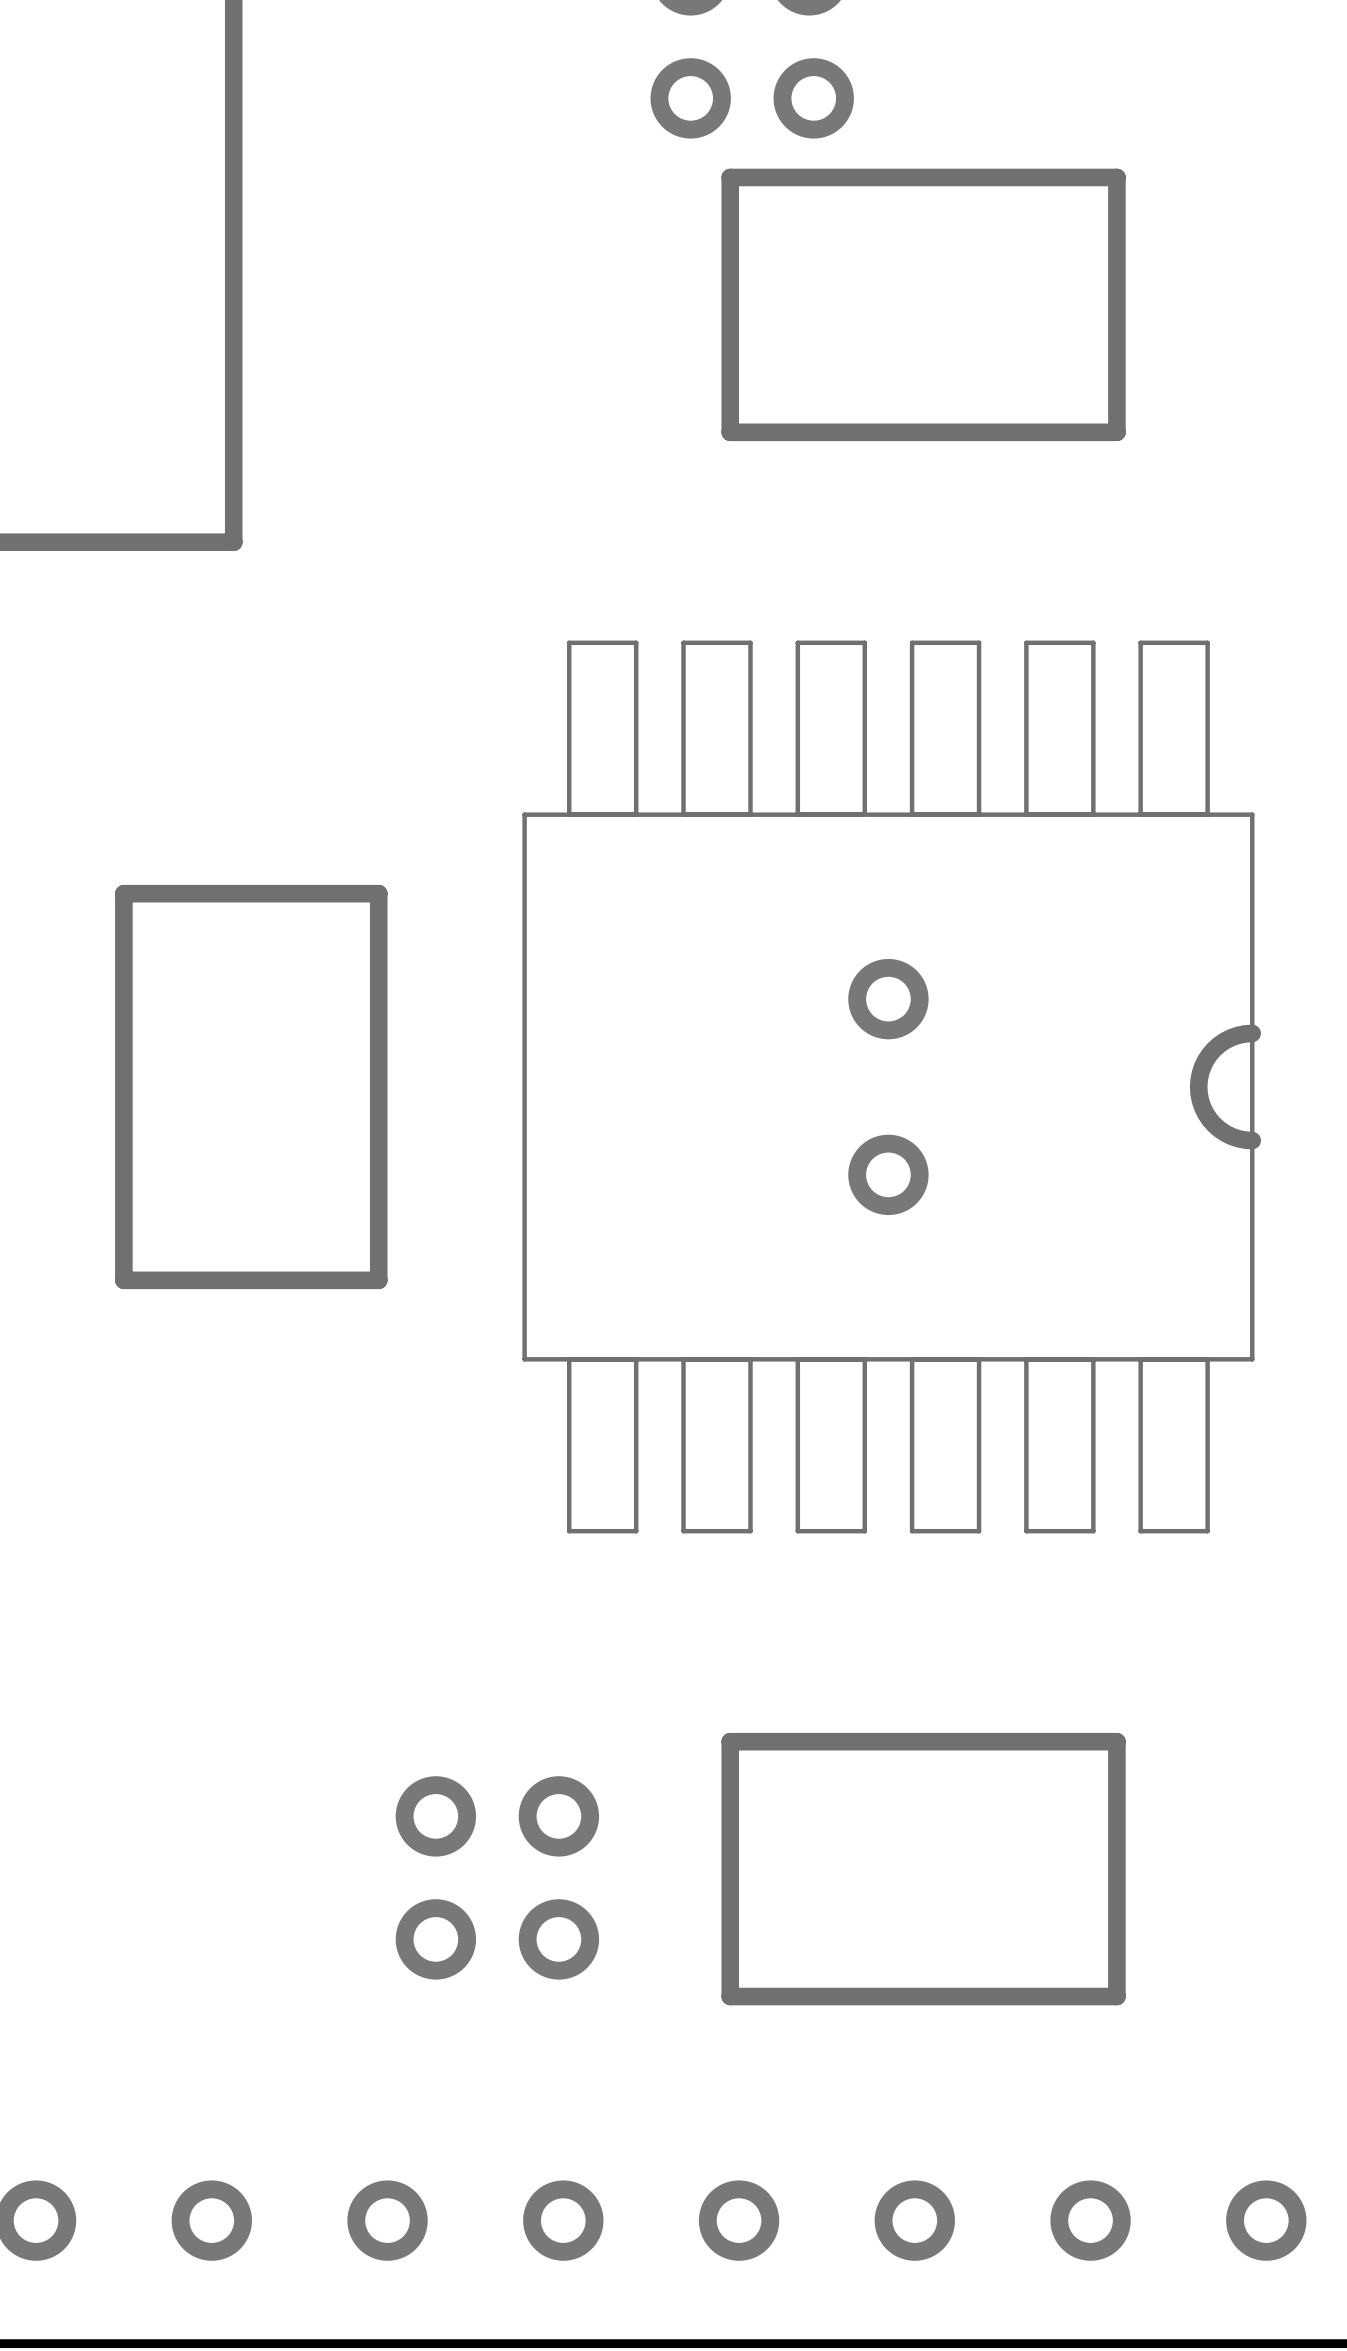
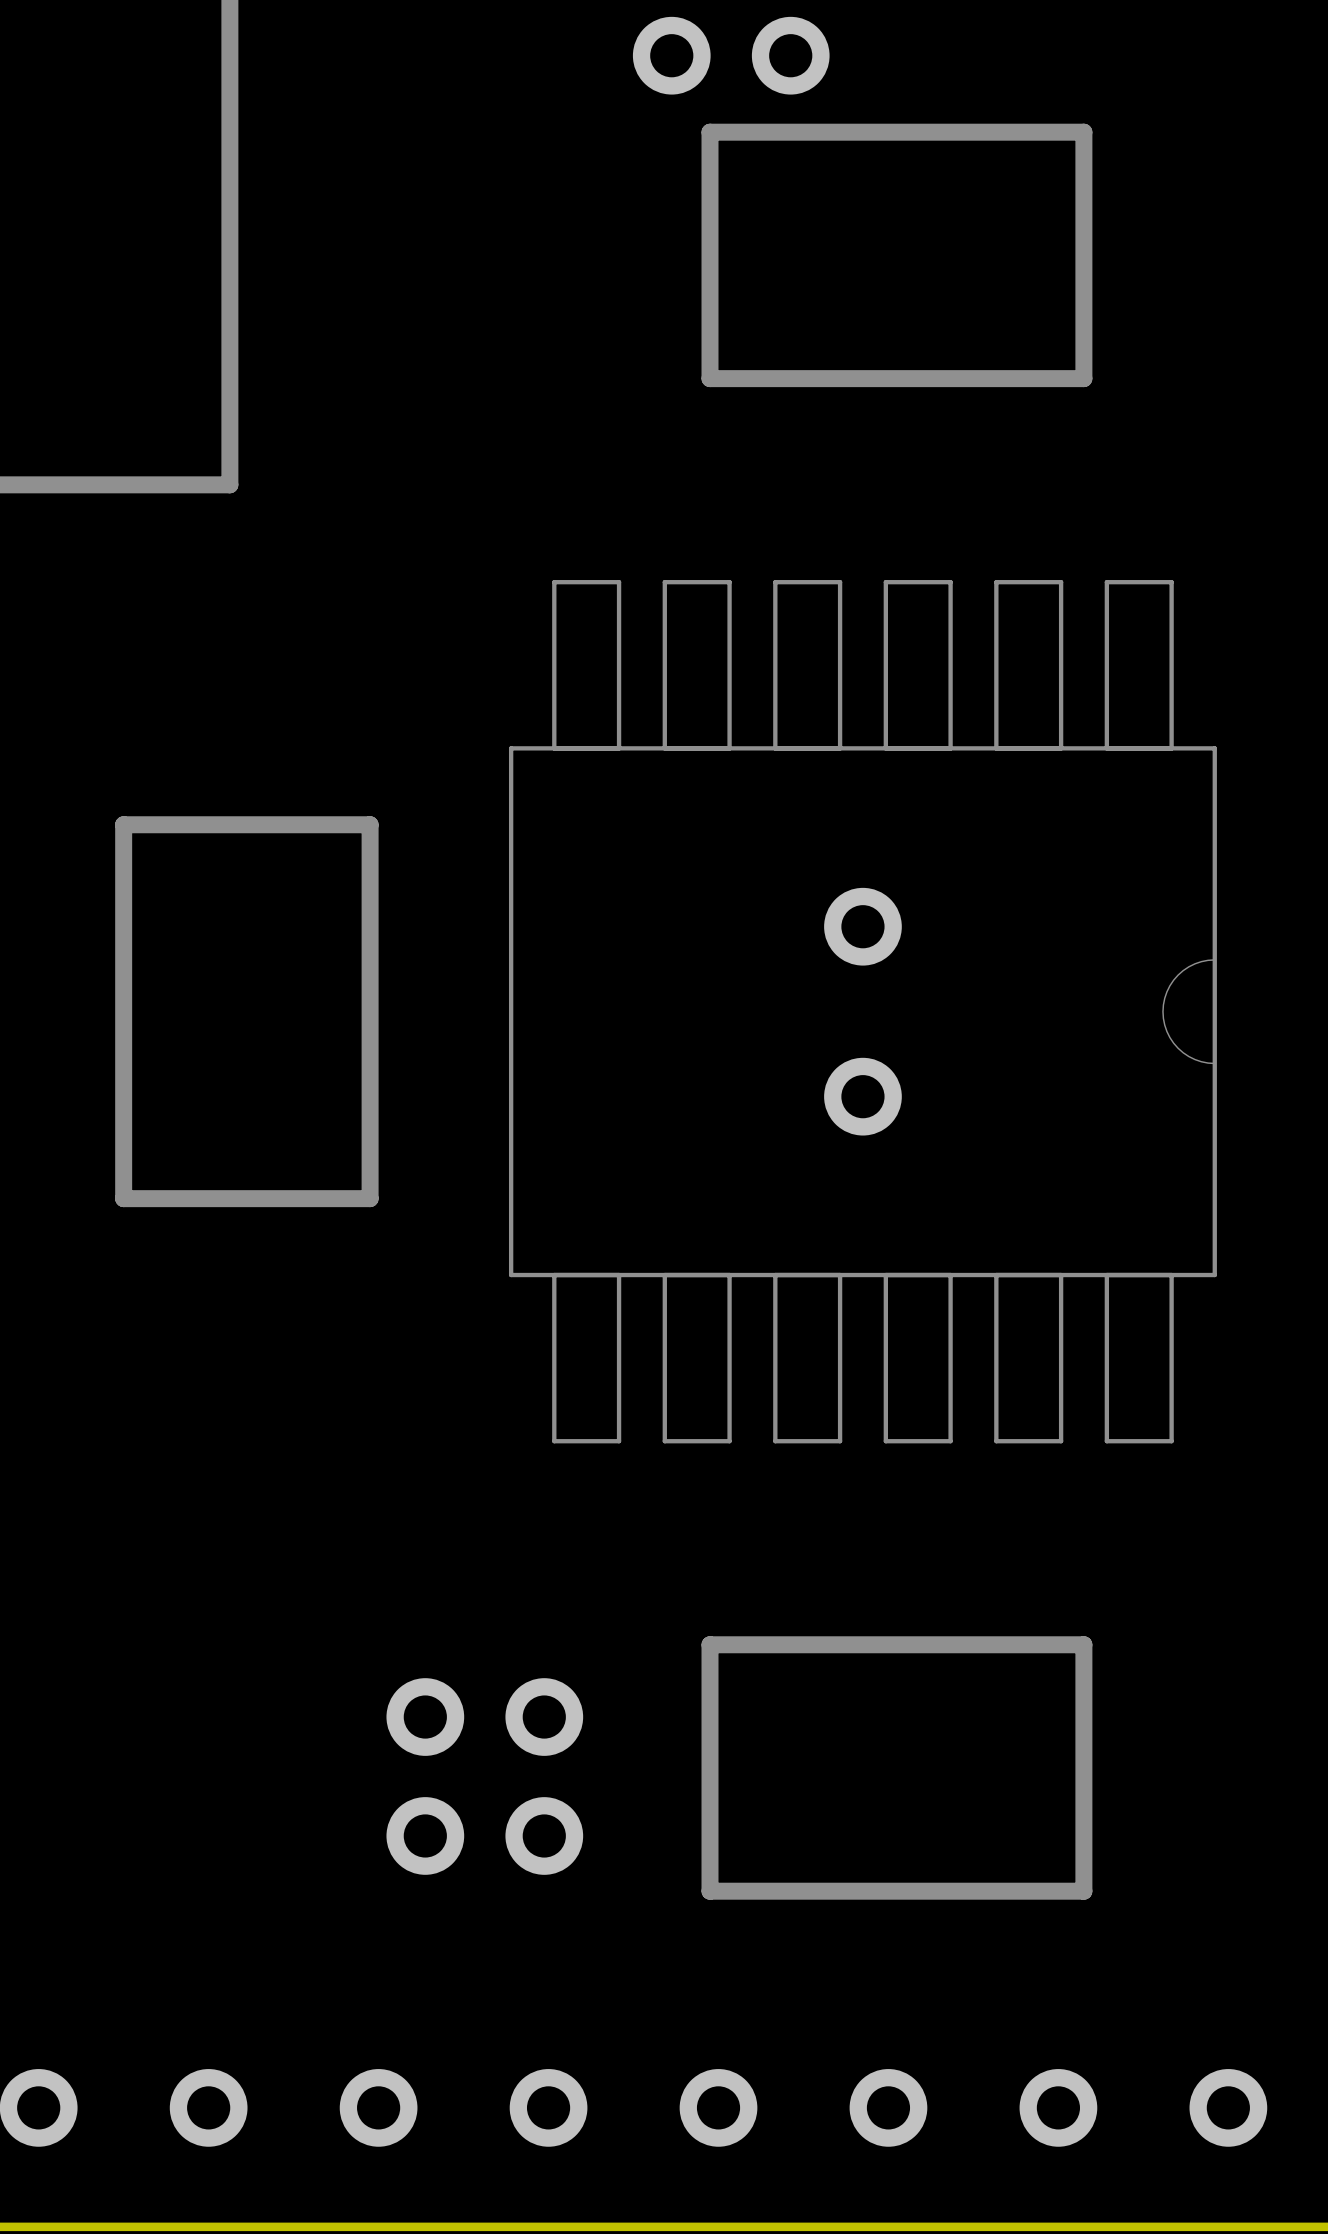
part footprint: [522, 640, 1262, 1534] -> [508, 580, 1217, 1444]

